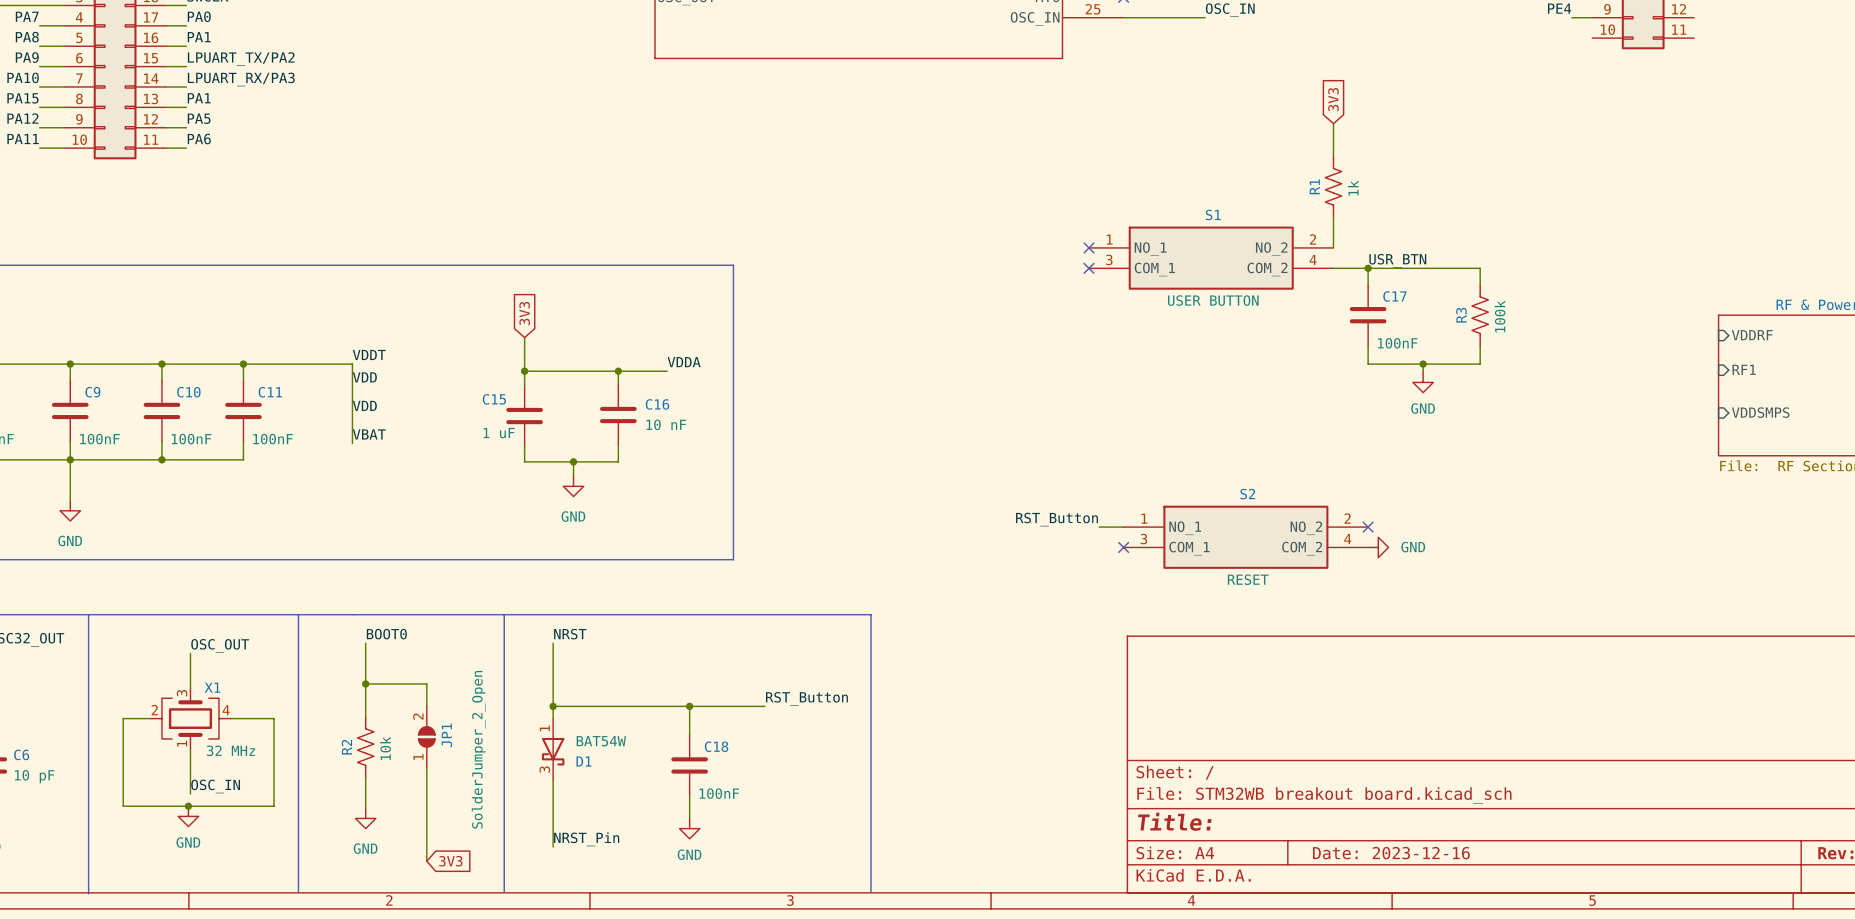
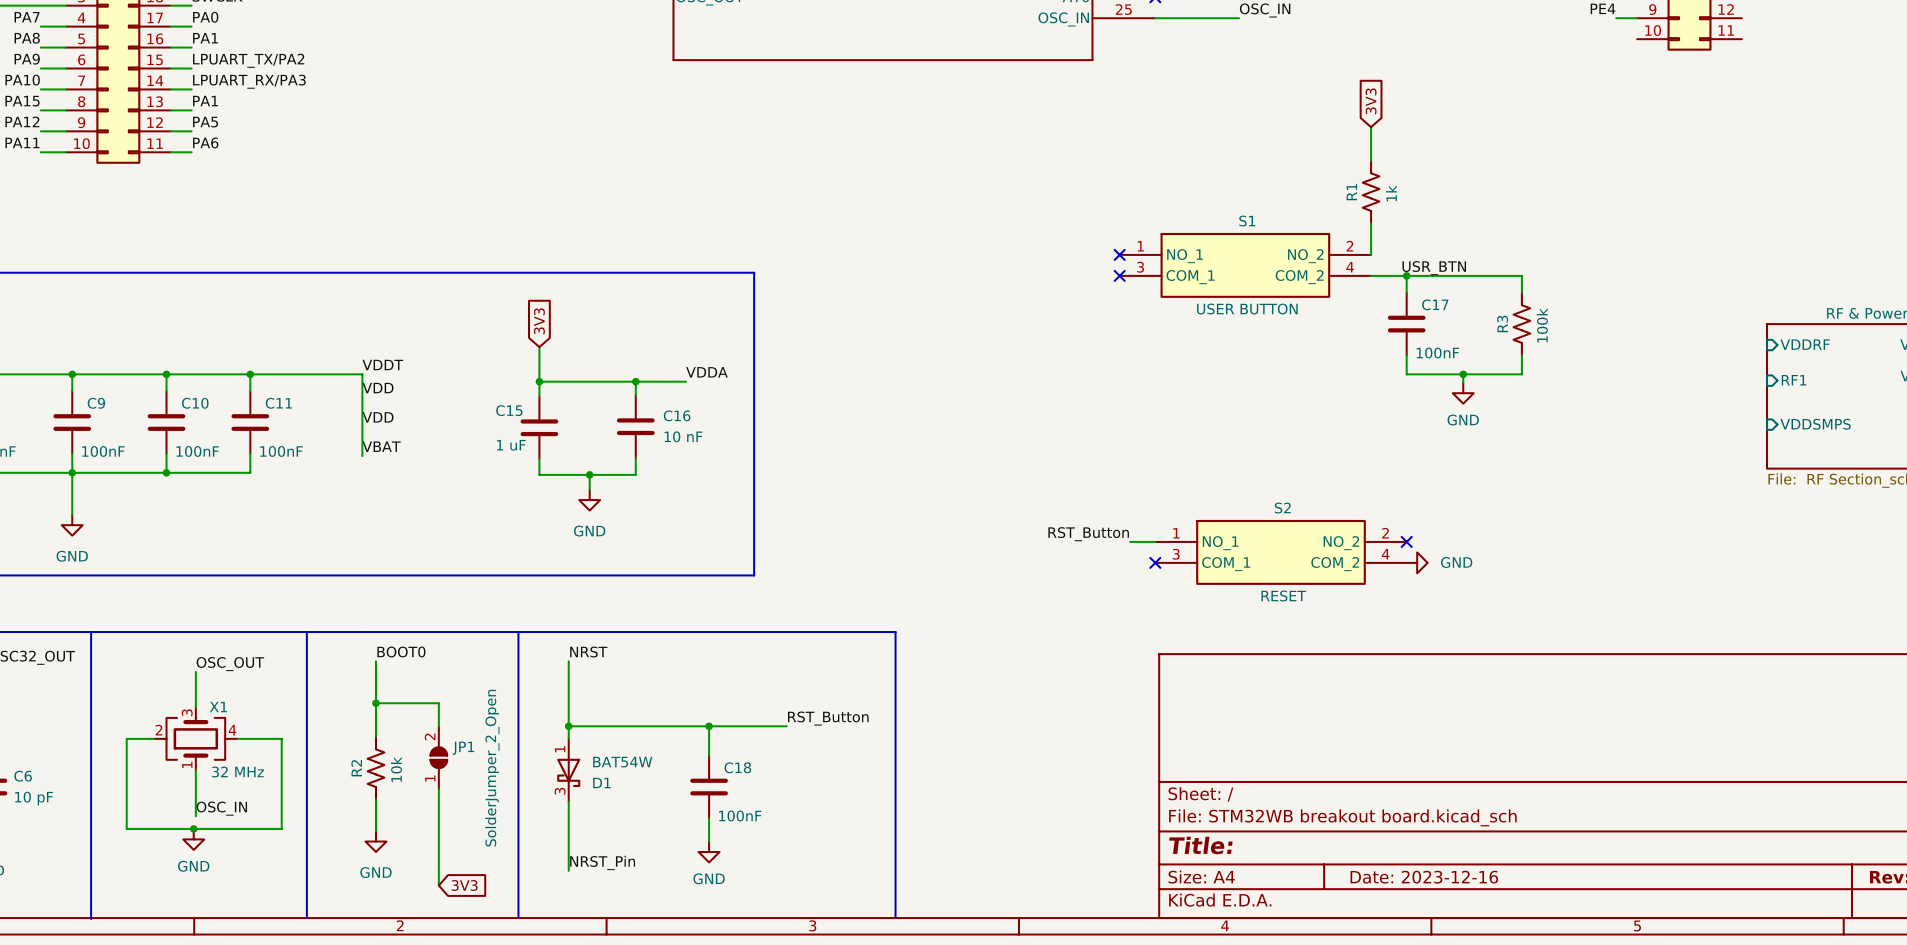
JP1 name rotation: 0° (446, 735) -> 90° clockwise (463, 748)

